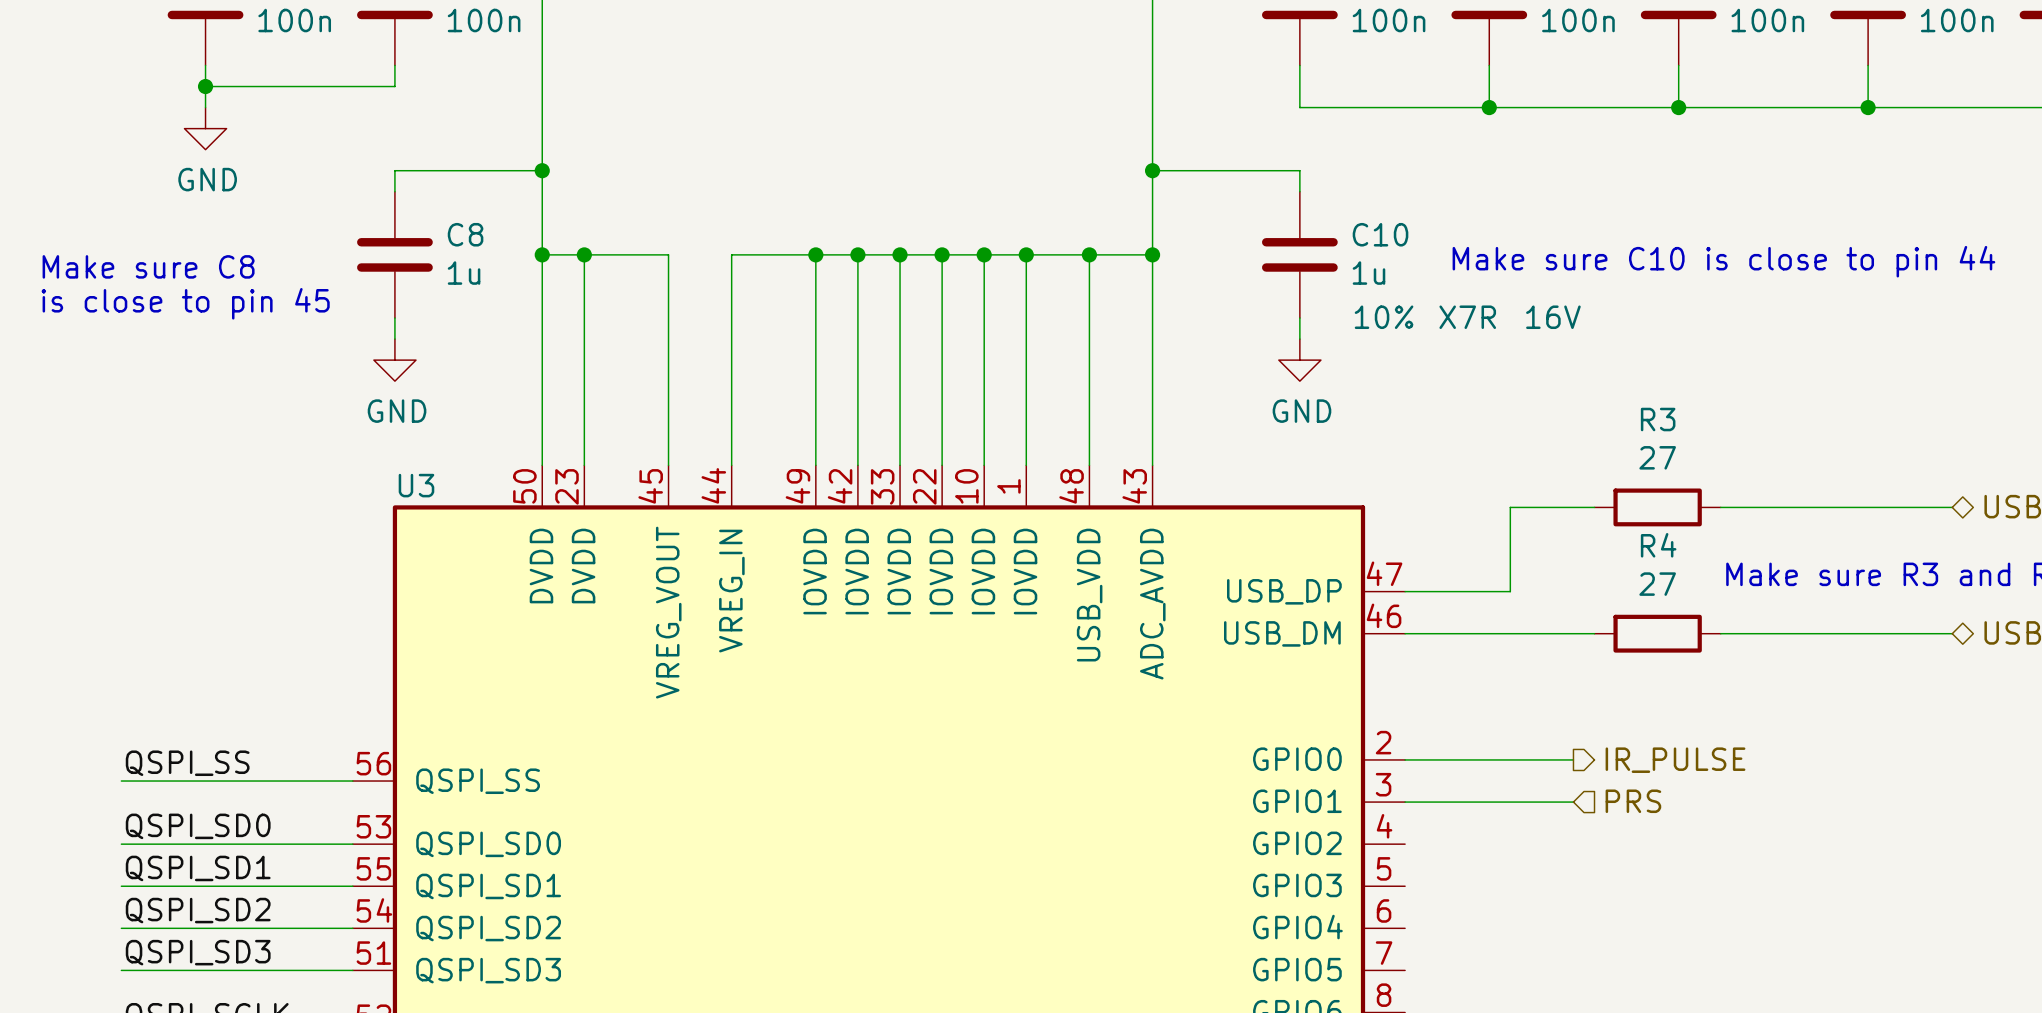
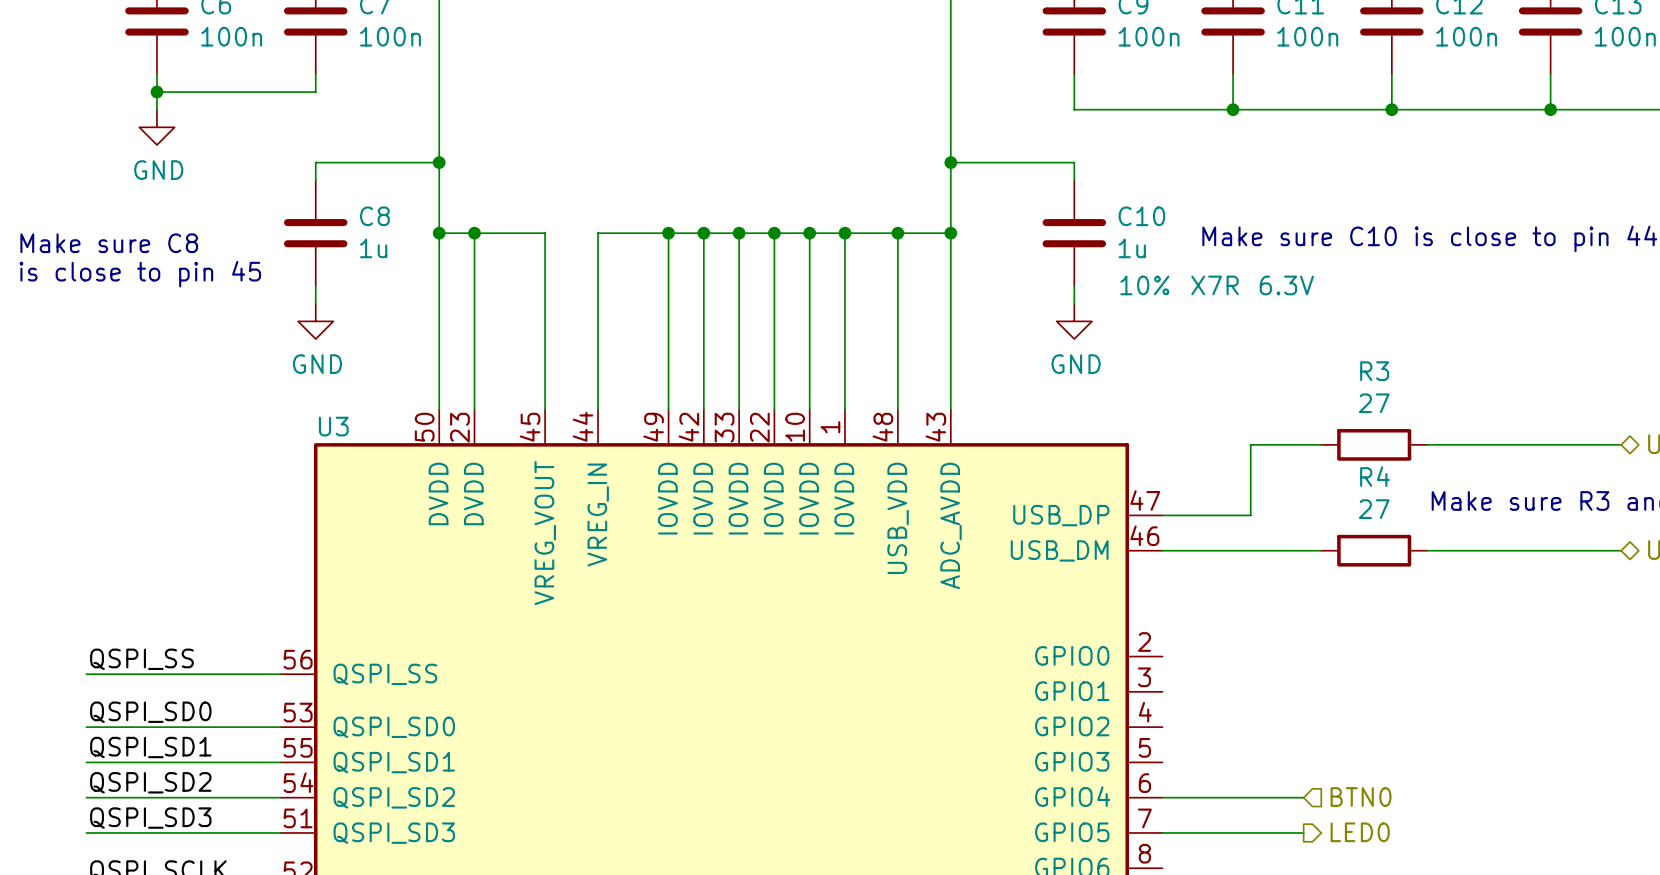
C10 text: 16V (1553, 317) -> 6.3V (1286, 285)
wire: (1405, 759) (1573, 759) -> (1162, 797) (1303, 797)
hierarchical label: IR_PULSE (1675, 760) -> none
hierarchical label: PRS (1633, 801) -> none
wire: (1405, 802) (1573, 802) -> (1162, 832) (1303, 832)
hierarchical label: none -> BTN0 (1361, 797)
hierarchical label: none -> LED0 (1360, 832)

